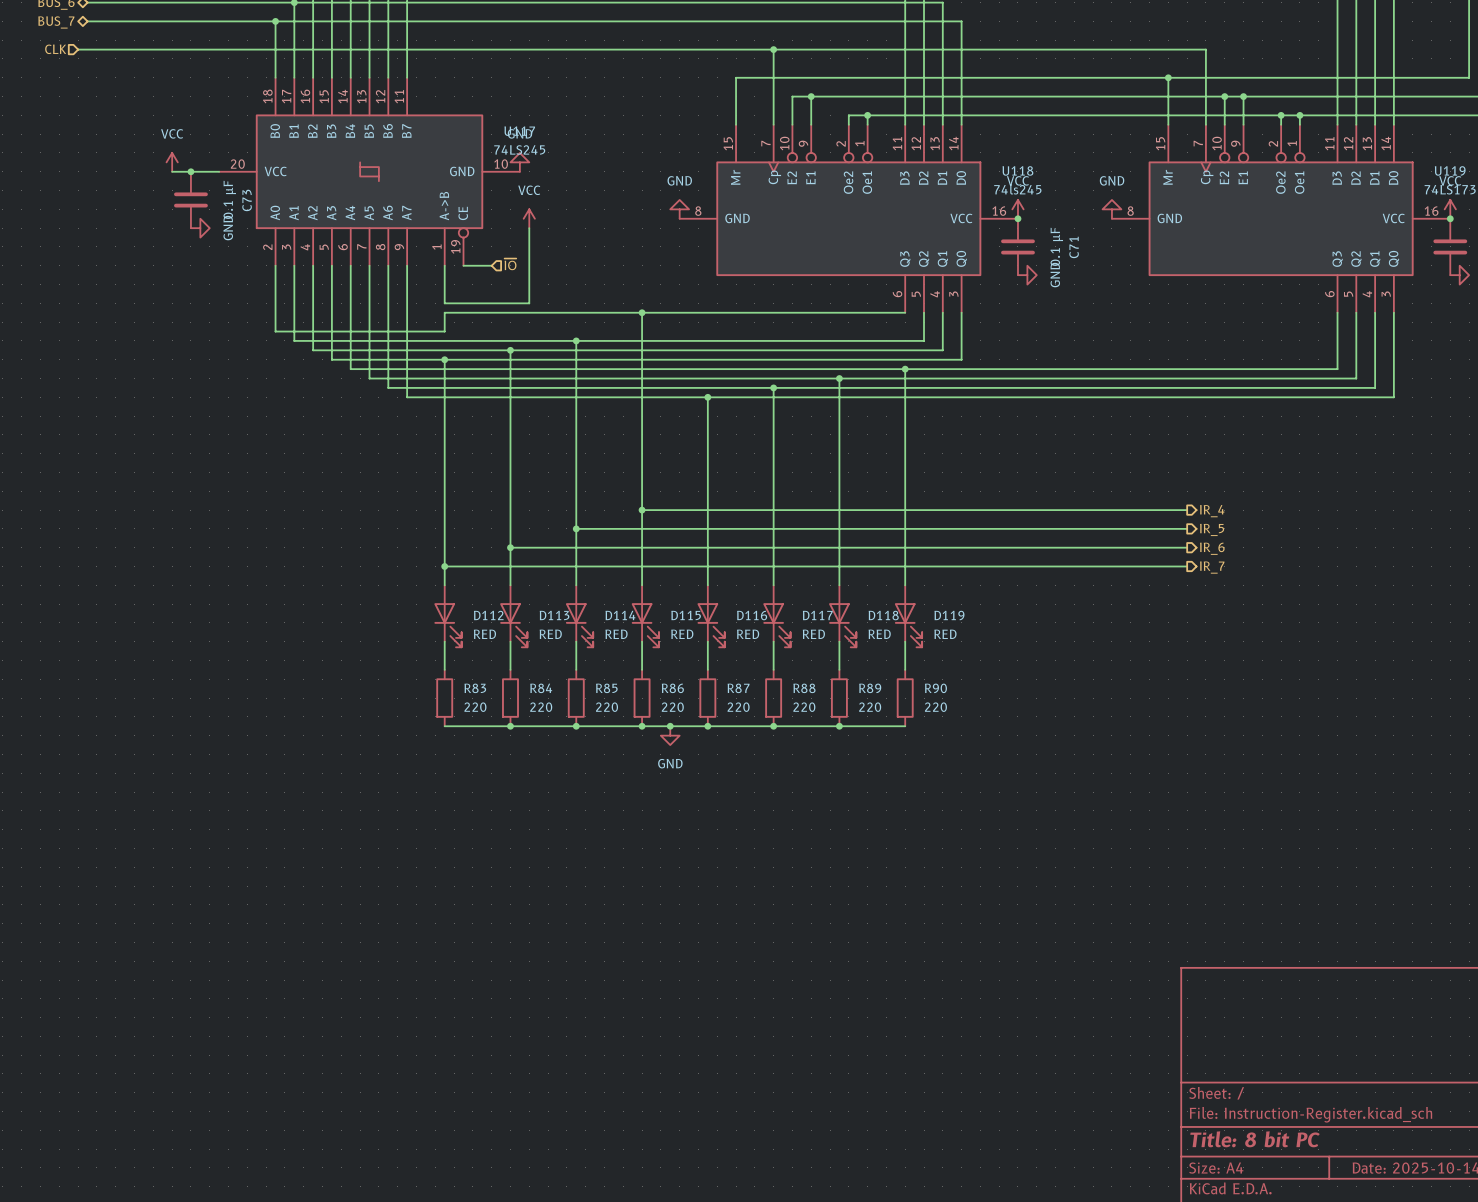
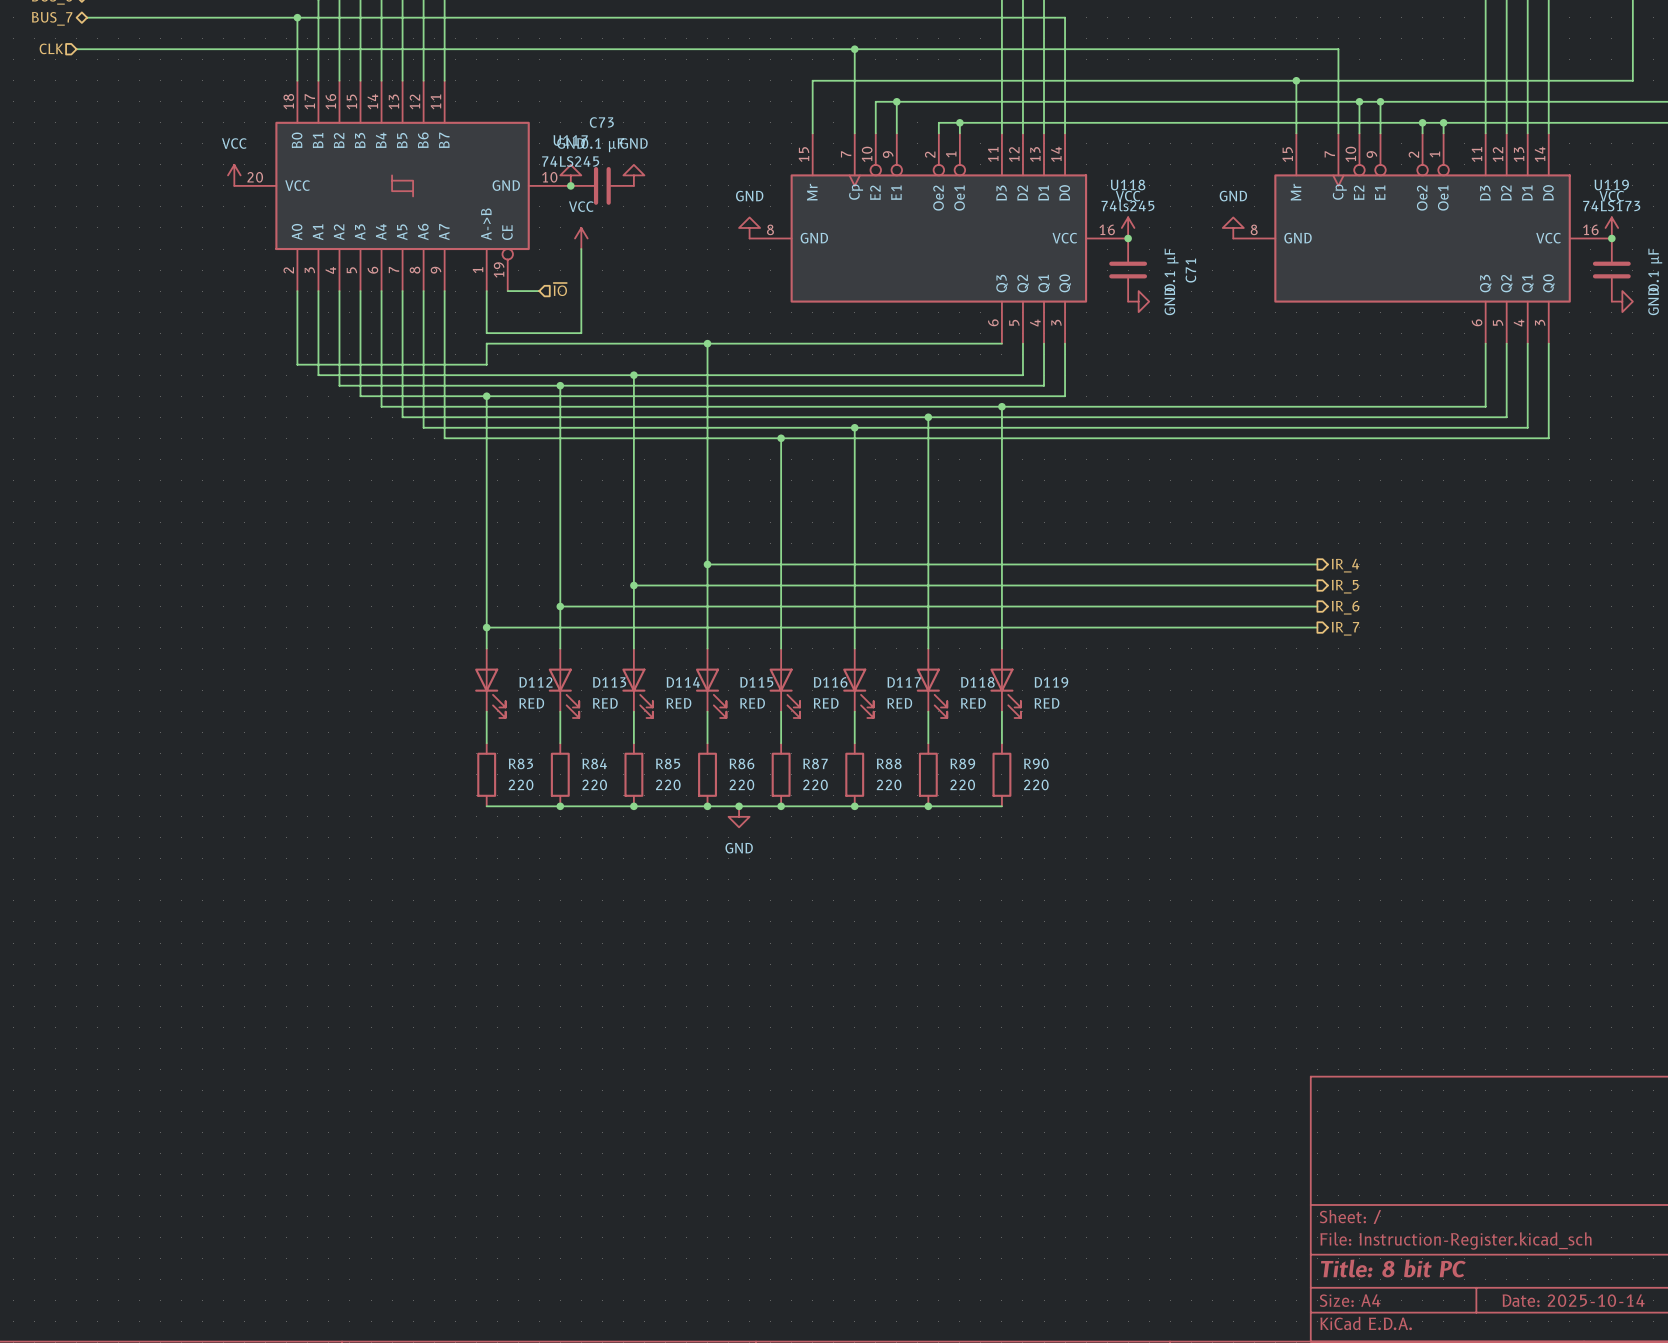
power symbol position: VCC (172, 162) -> VCC (234, 175)
power symbol: none -> GND (633, 175)
wire: (172, 171) (219, 171) -> none
junction: (190, 171) -> none
junction: none -> (570, 185)
C73 rotation: 0° (190, 199) -> 90° clockwise (602, 185)
C73 position: (190, 199) -> (602, 185)
C73 value position: 0.1 µF (229, 199) -> 0.1 µF (602, 145)
C73 name position: C73 (247, 200) -> C73 (601, 122)
power symbol: GND (200, 228) -> none

